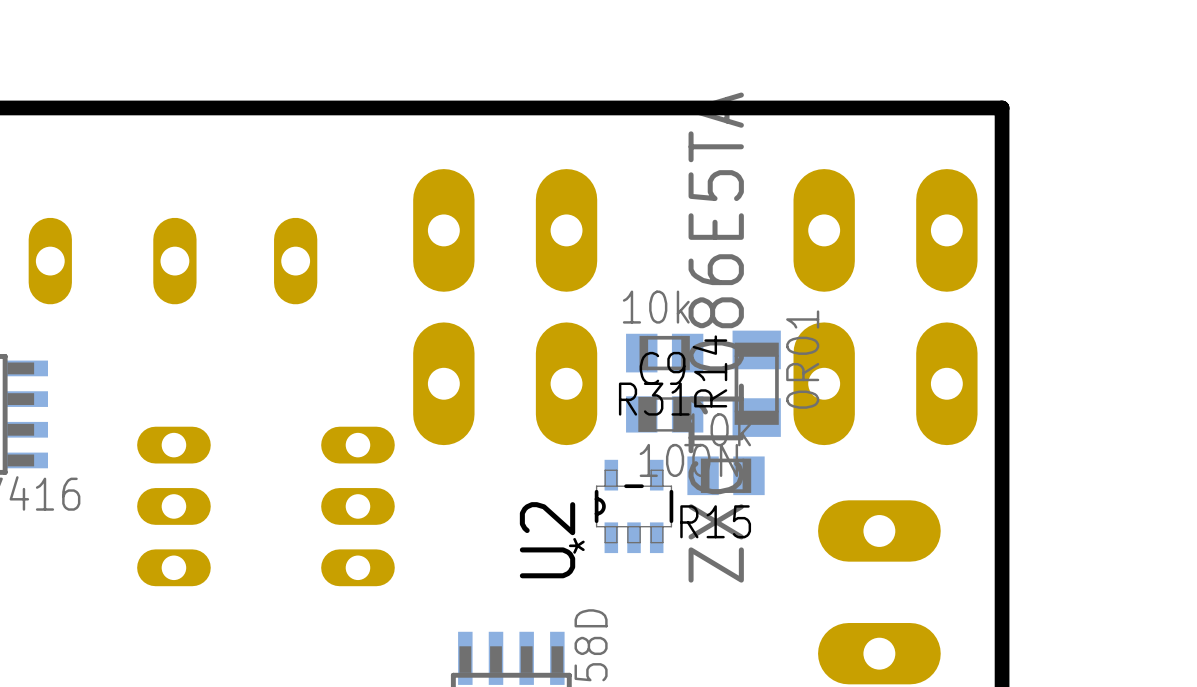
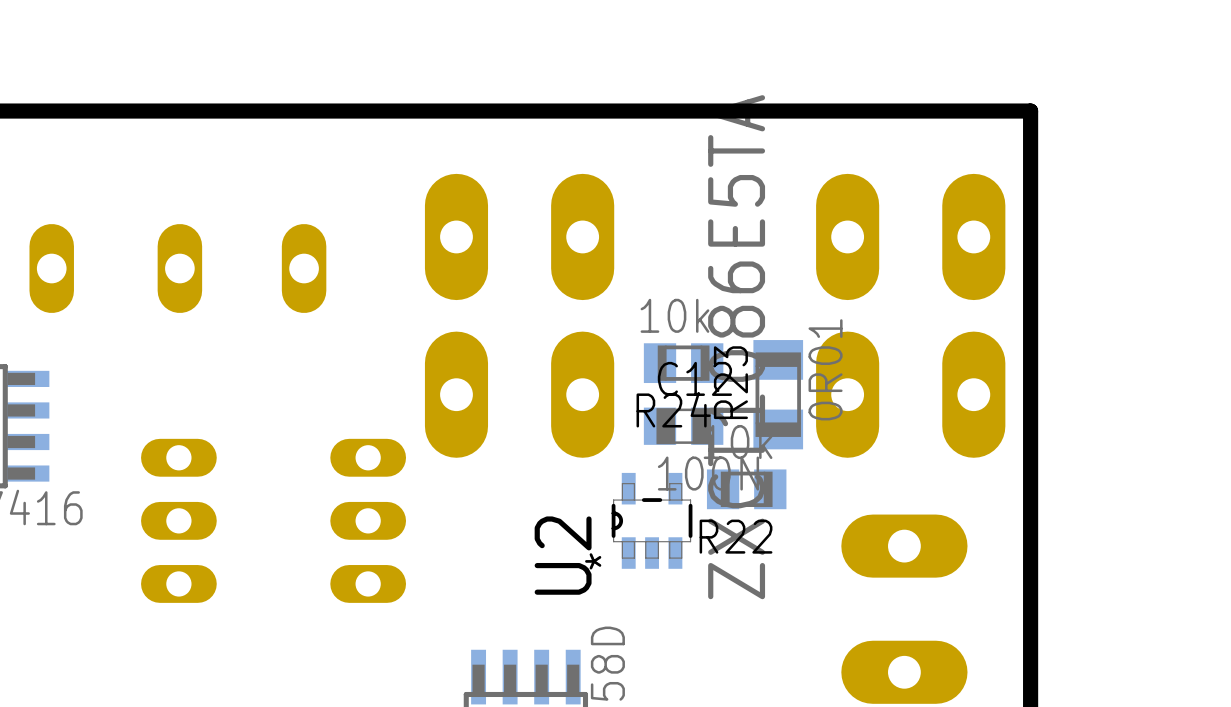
C9 name: C9 (662, 368) -> C12 (694, 378)
R14 name: R14 (709, 371) -> R23 (730, 382)
R31 name: R31 (654, 399) -> R24 (673, 409)
R15 name: R15 (715, 521) -> R22 (736, 536)

